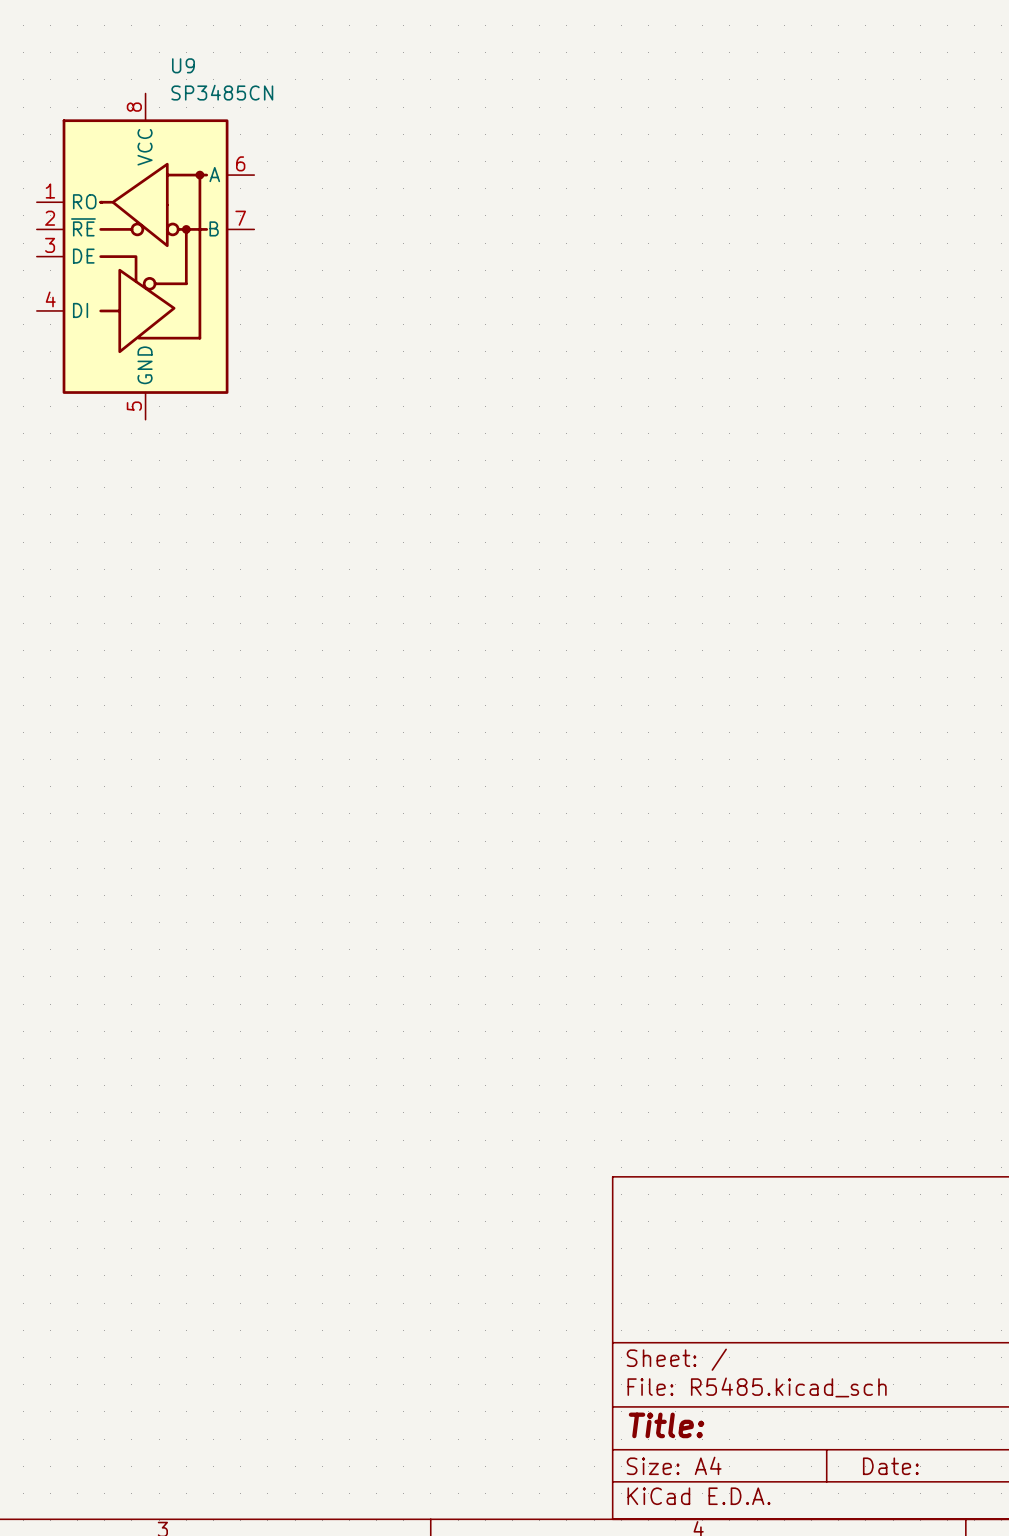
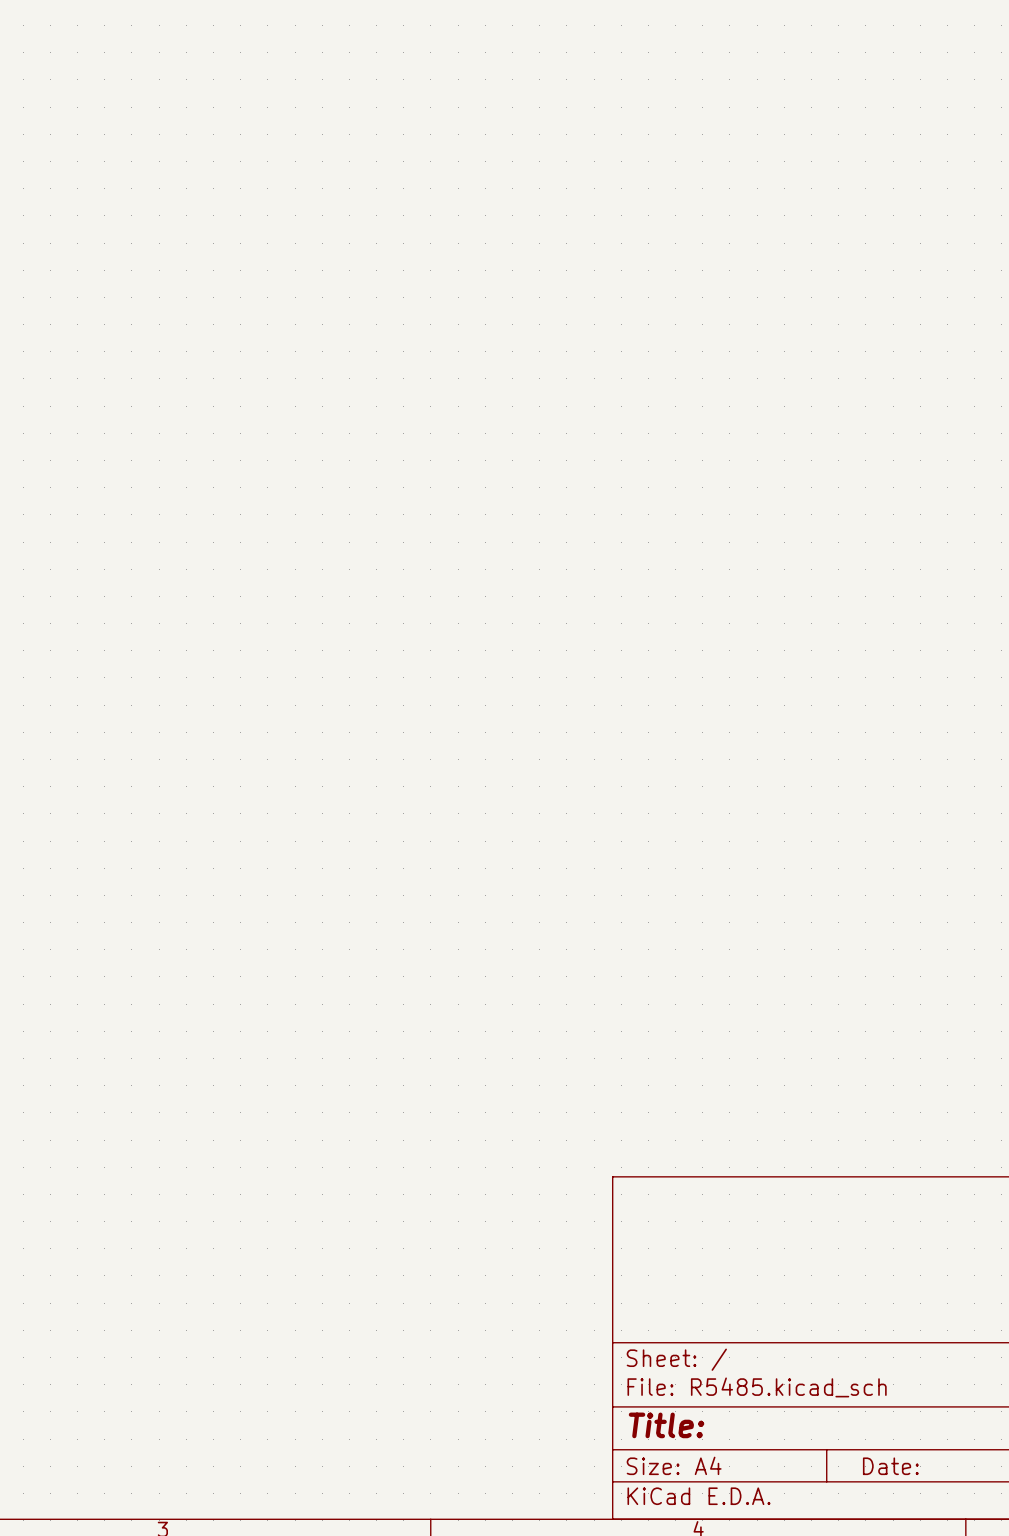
U9: SP3485CN (145, 256) -> none

